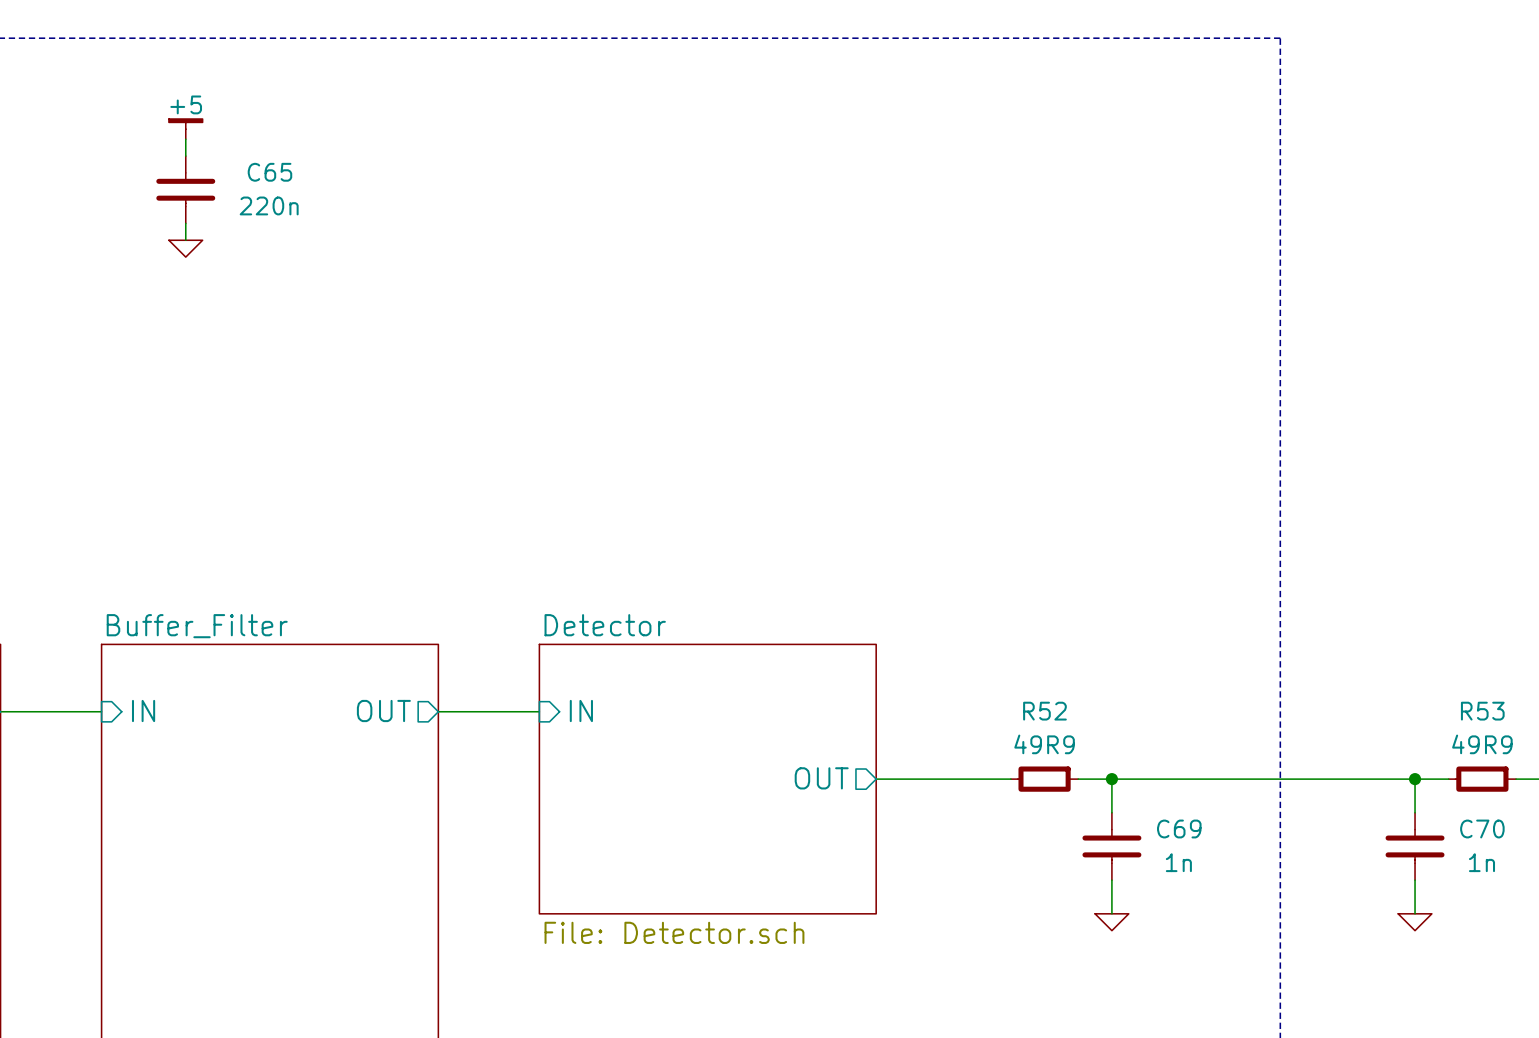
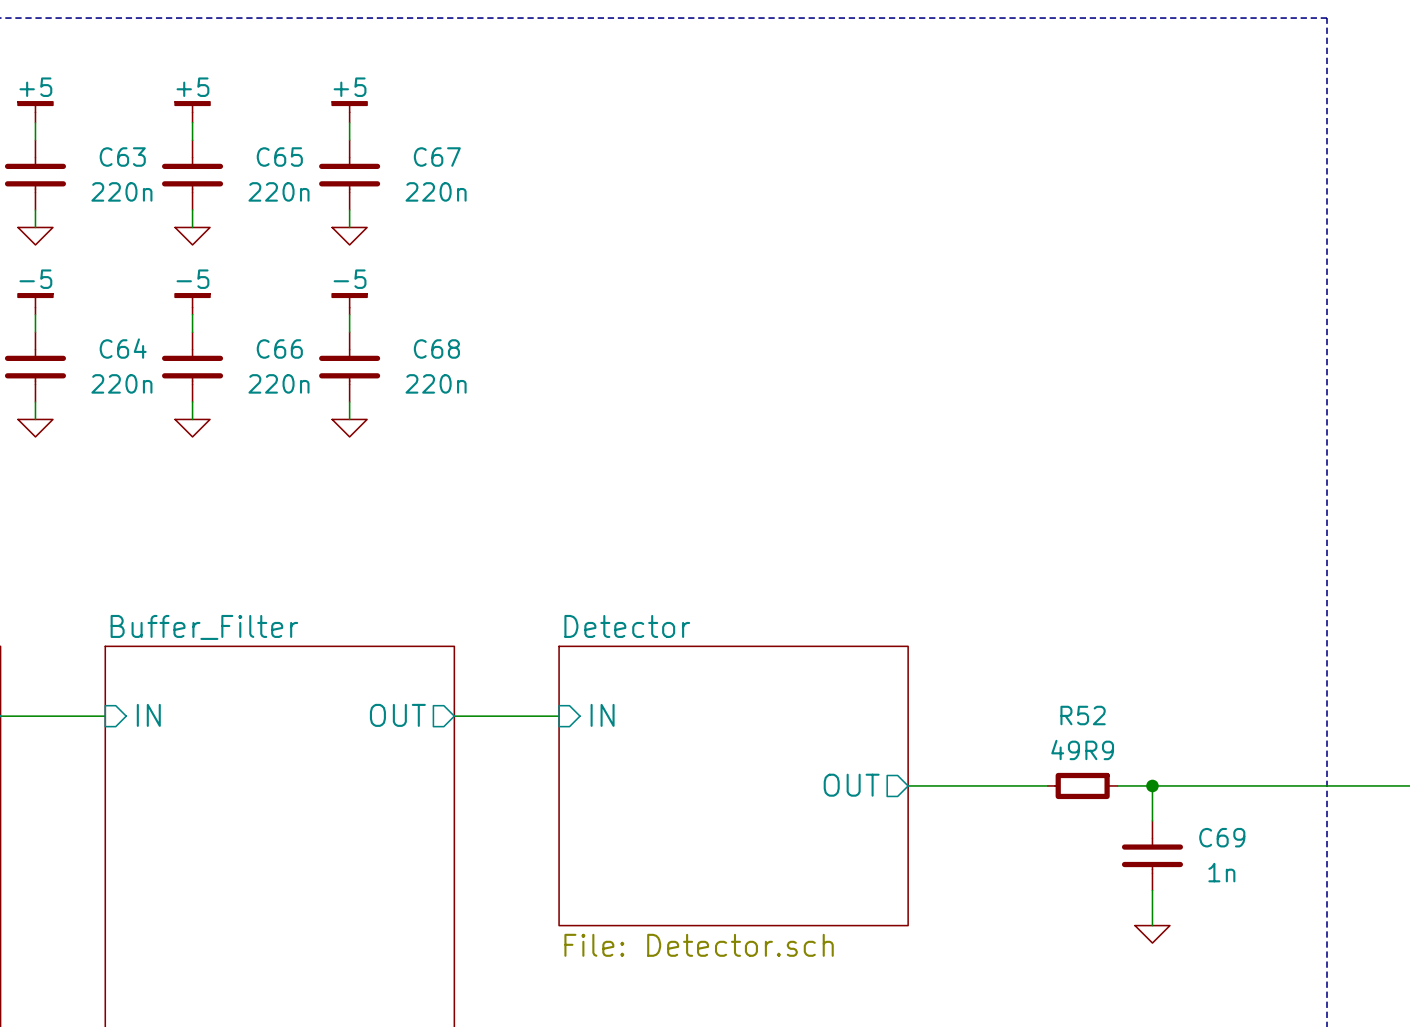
power symbol: none -> +5 (35, 112)
power symbol: none -> +5 (349, 112)
wire: none -> (35, 122) (35, 140)
wire: none -> (349, 122) (349, 140)
C63: none -> 220n (35, 175)
C67: none -> 220n (349, 175)
wire: none -> (35, 210) (35, 227)
wire: none -> (349, 210) (349, 227)
power symbol: none -> (35, 236)
power symbol: none -> (349, 236)
power symbol: none -> -5 (35, 304)
power symbol: none -> -5 (192, 304)
power symbol: none -> -5 (349, 304)
wire: none -> (35, 314) (35, 332)
wire: none -> (192, 314) (192, 332)
wire: none -> (349, 314) (349, 332)
C64: none -> 220n (35, 367)
C66: none -> 220n (192, 367)
C68: none -> 220n (349, 367)
wire: none -> (35, 402) (35, 419)
wire: none -> (192, 402) (192, 419)
wire: none -> (349, 402) (349, 419)
power symbol: none -> (35, 428)
power symbol: none -> (192, 428)
power symbol: none -> (349, 428)

